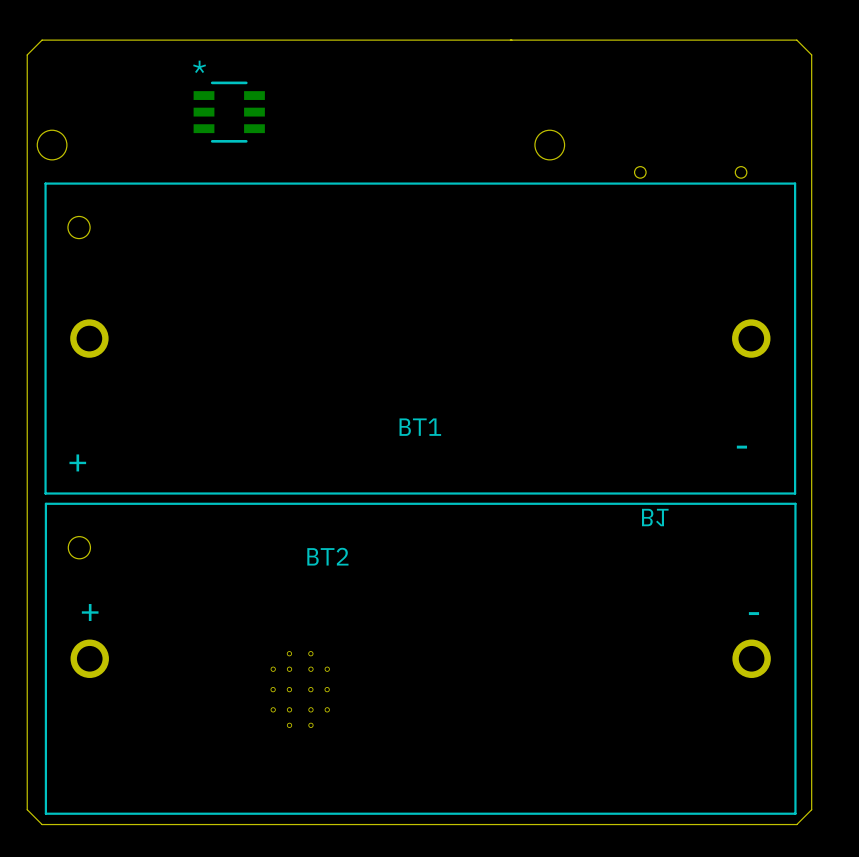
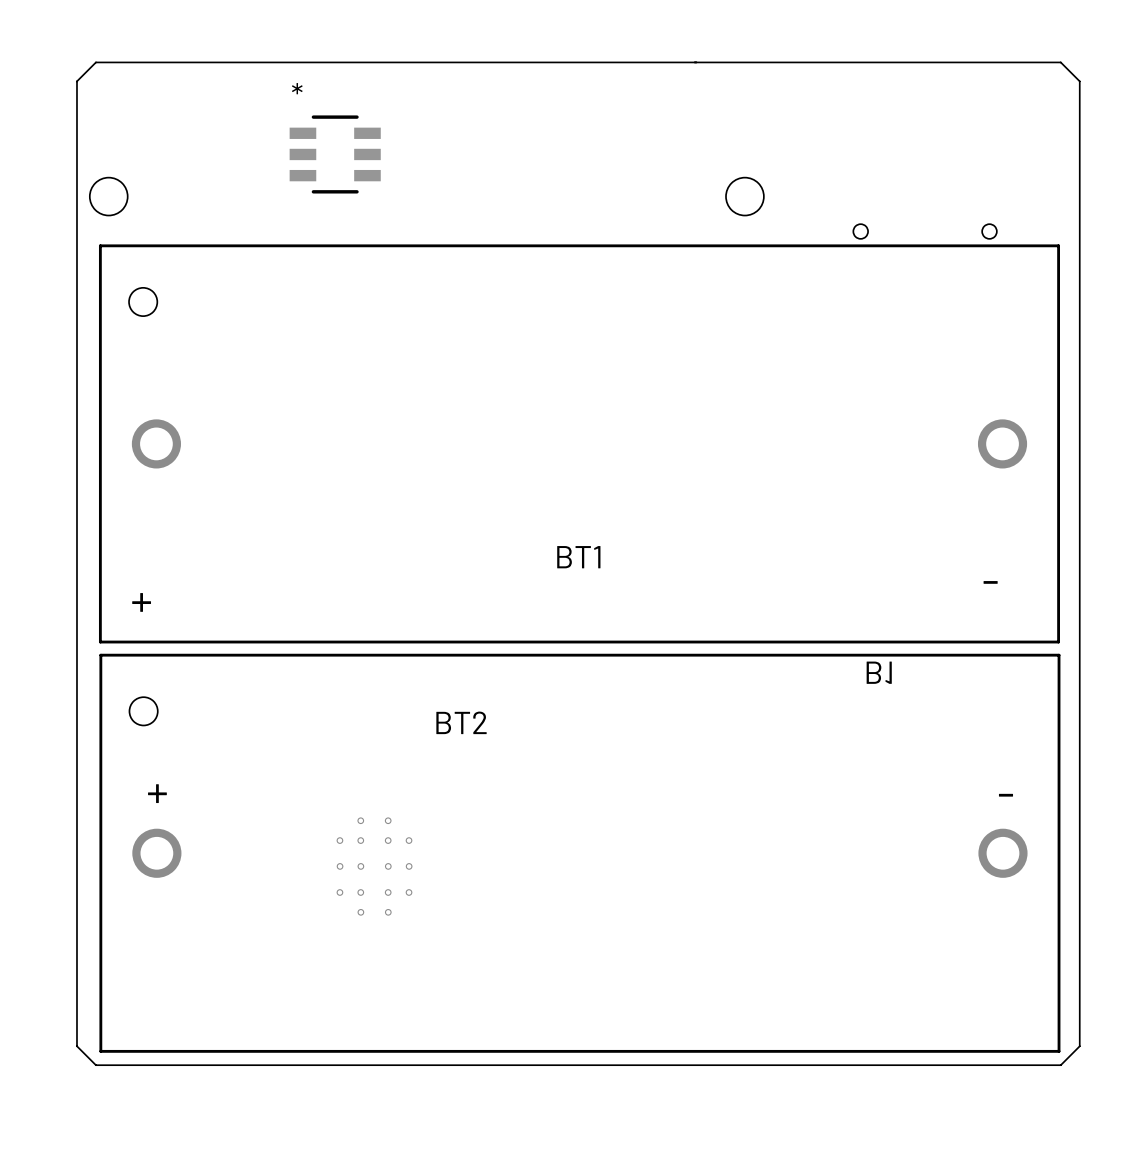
part position: (300, 689) -> (374, 866)

